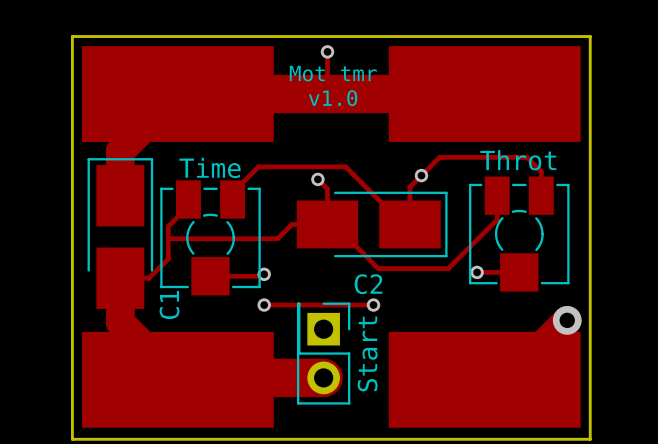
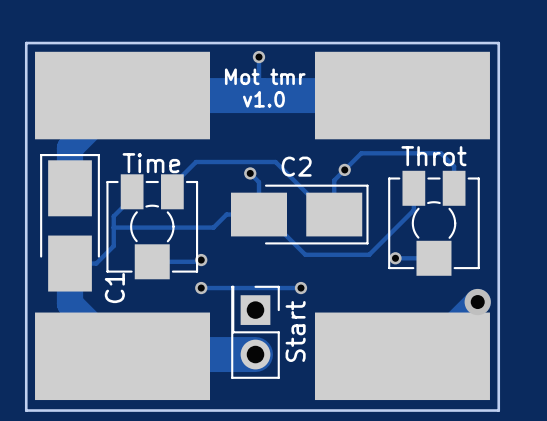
C2 name position: C2 (368, 284) -> C2 (296, 166)

